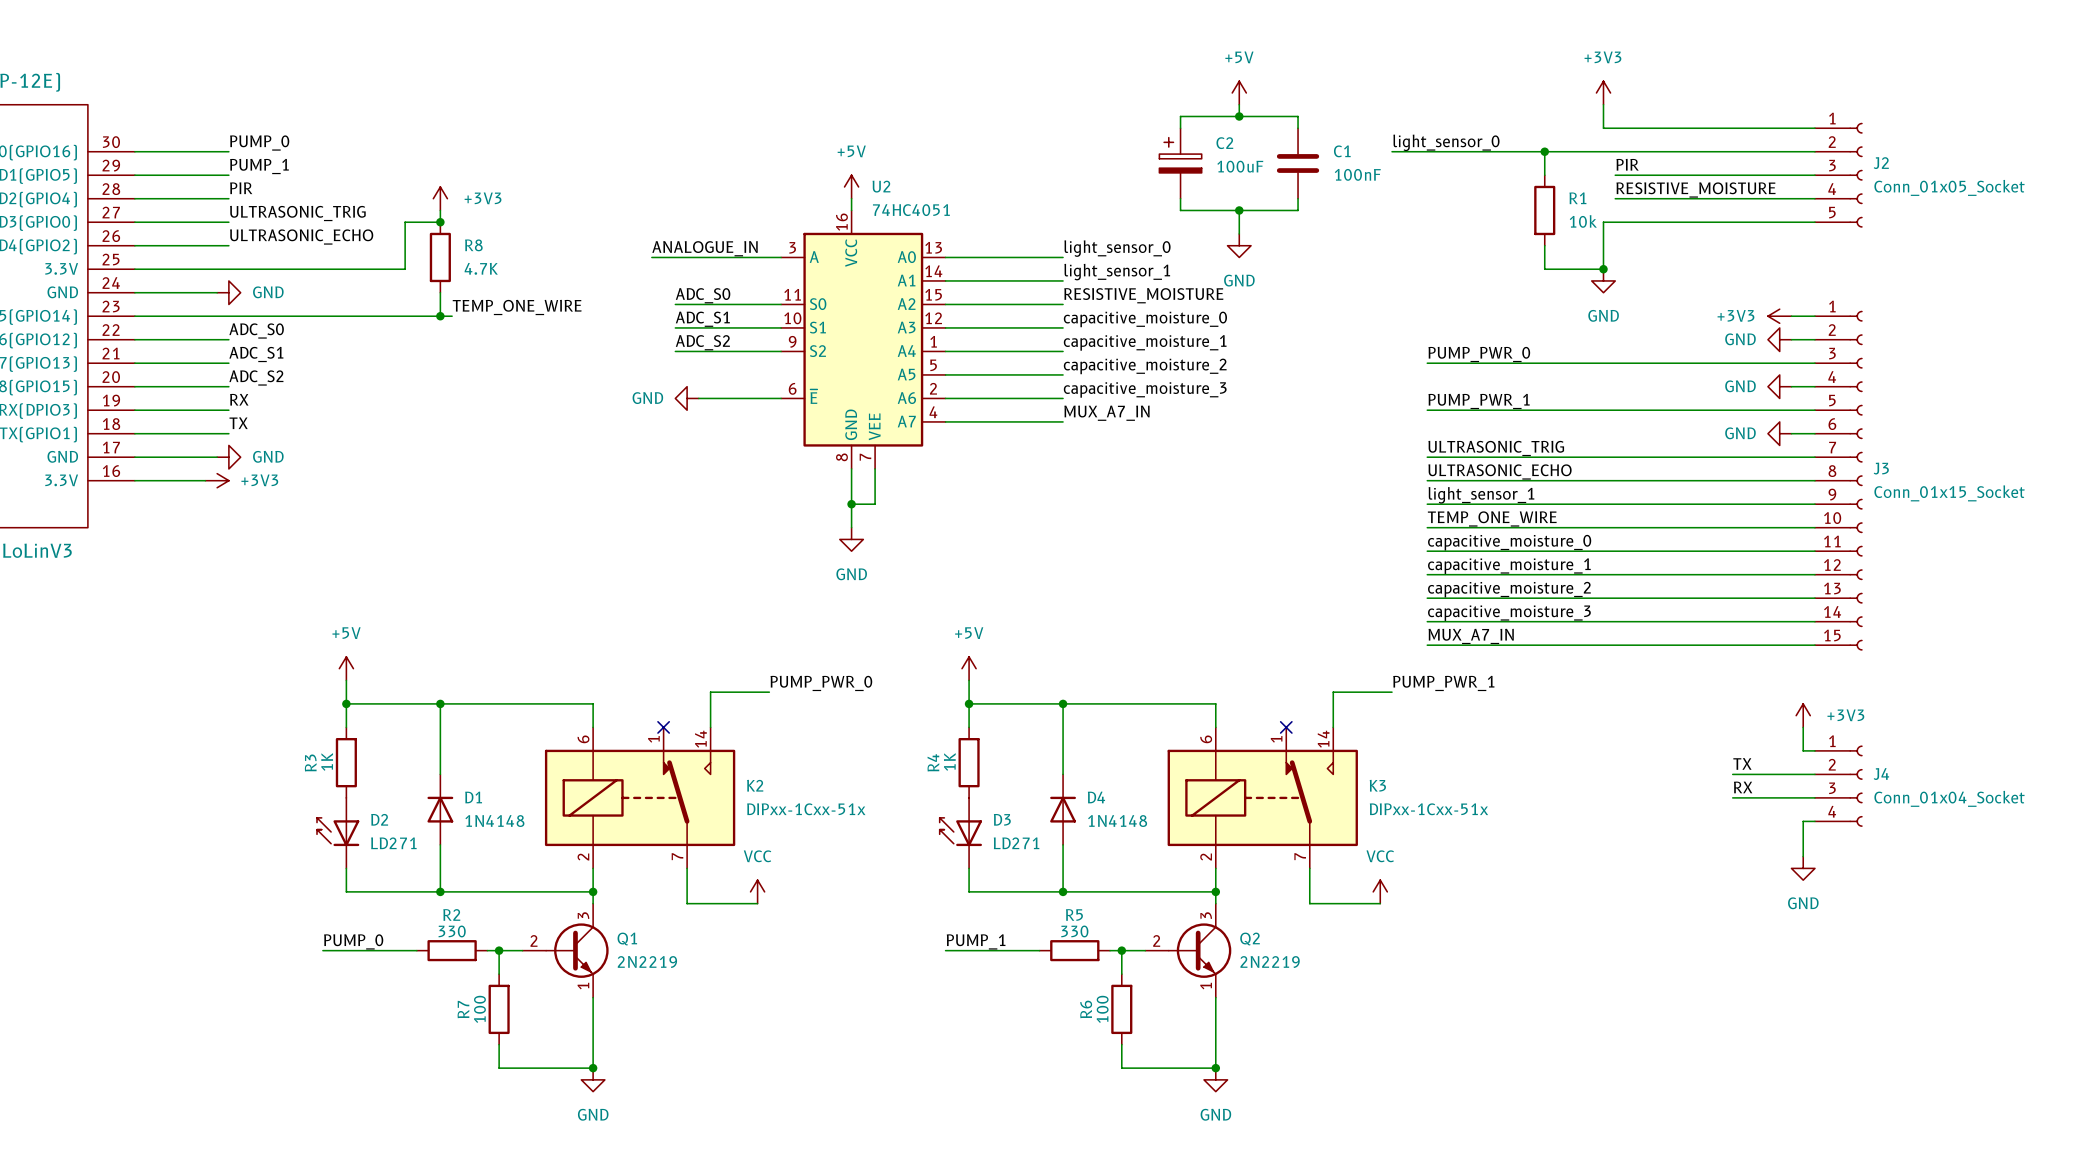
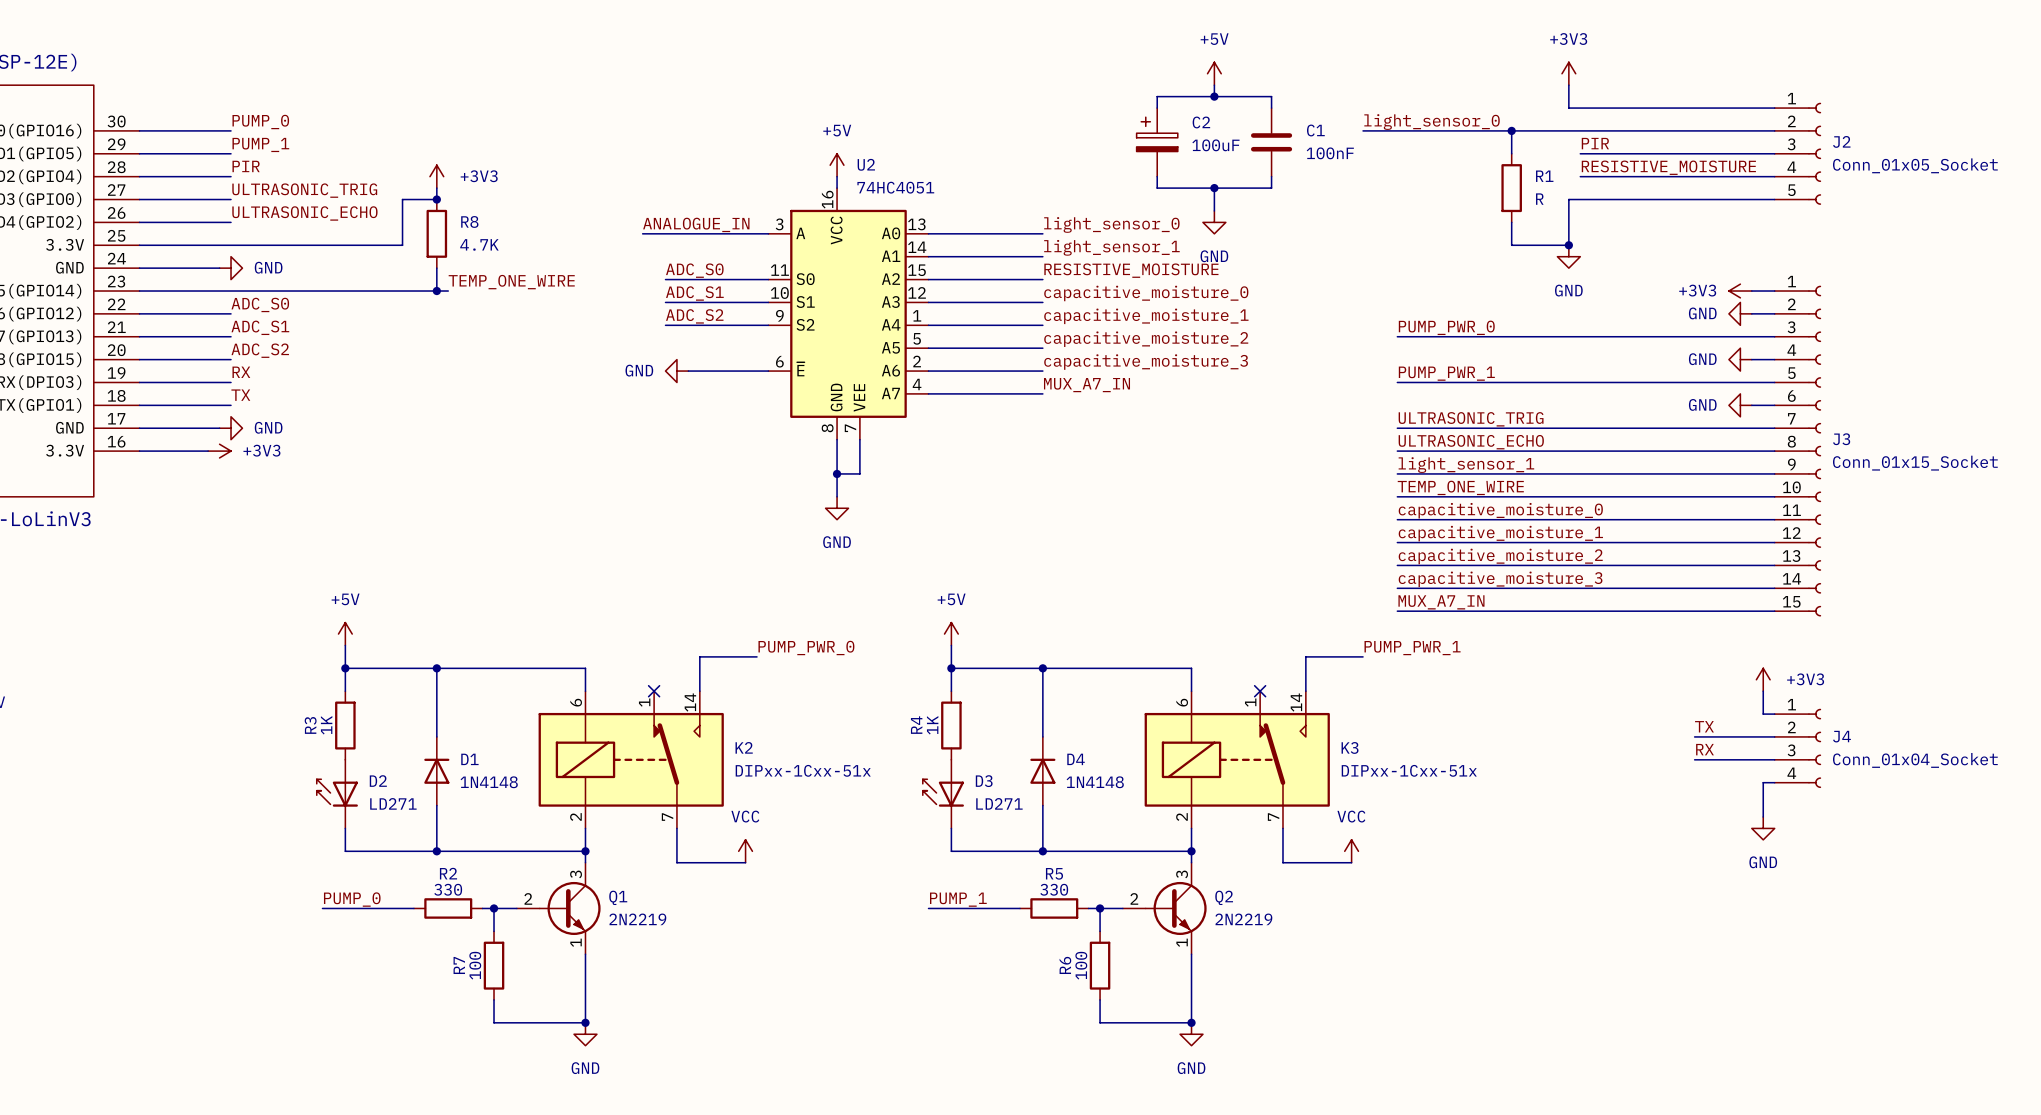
R1 value: 10k (1583, 221) -> R (1539, 199)

